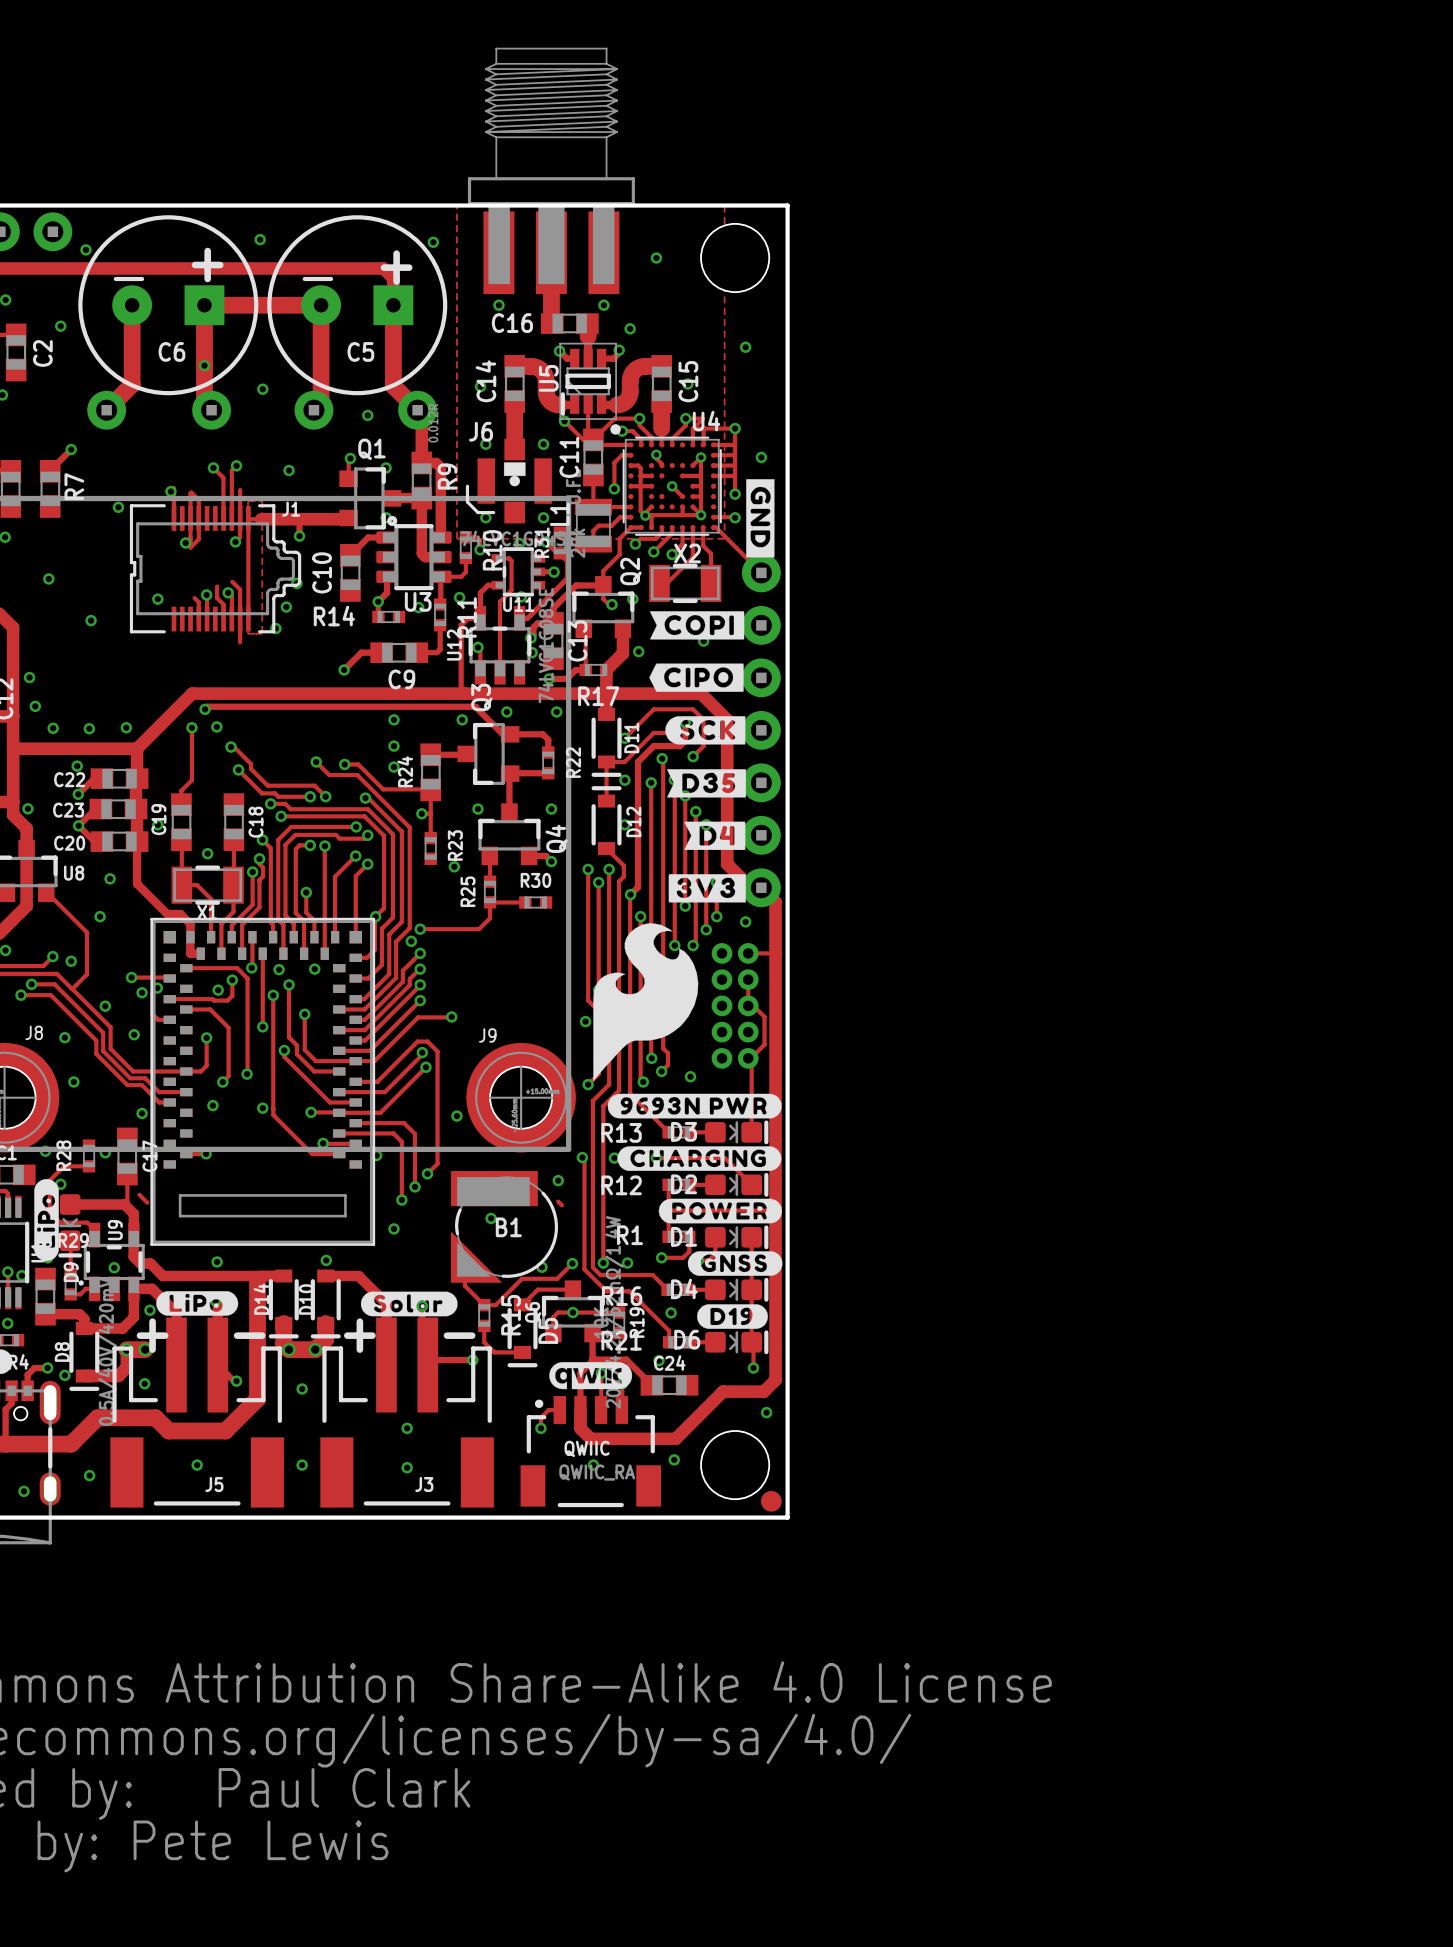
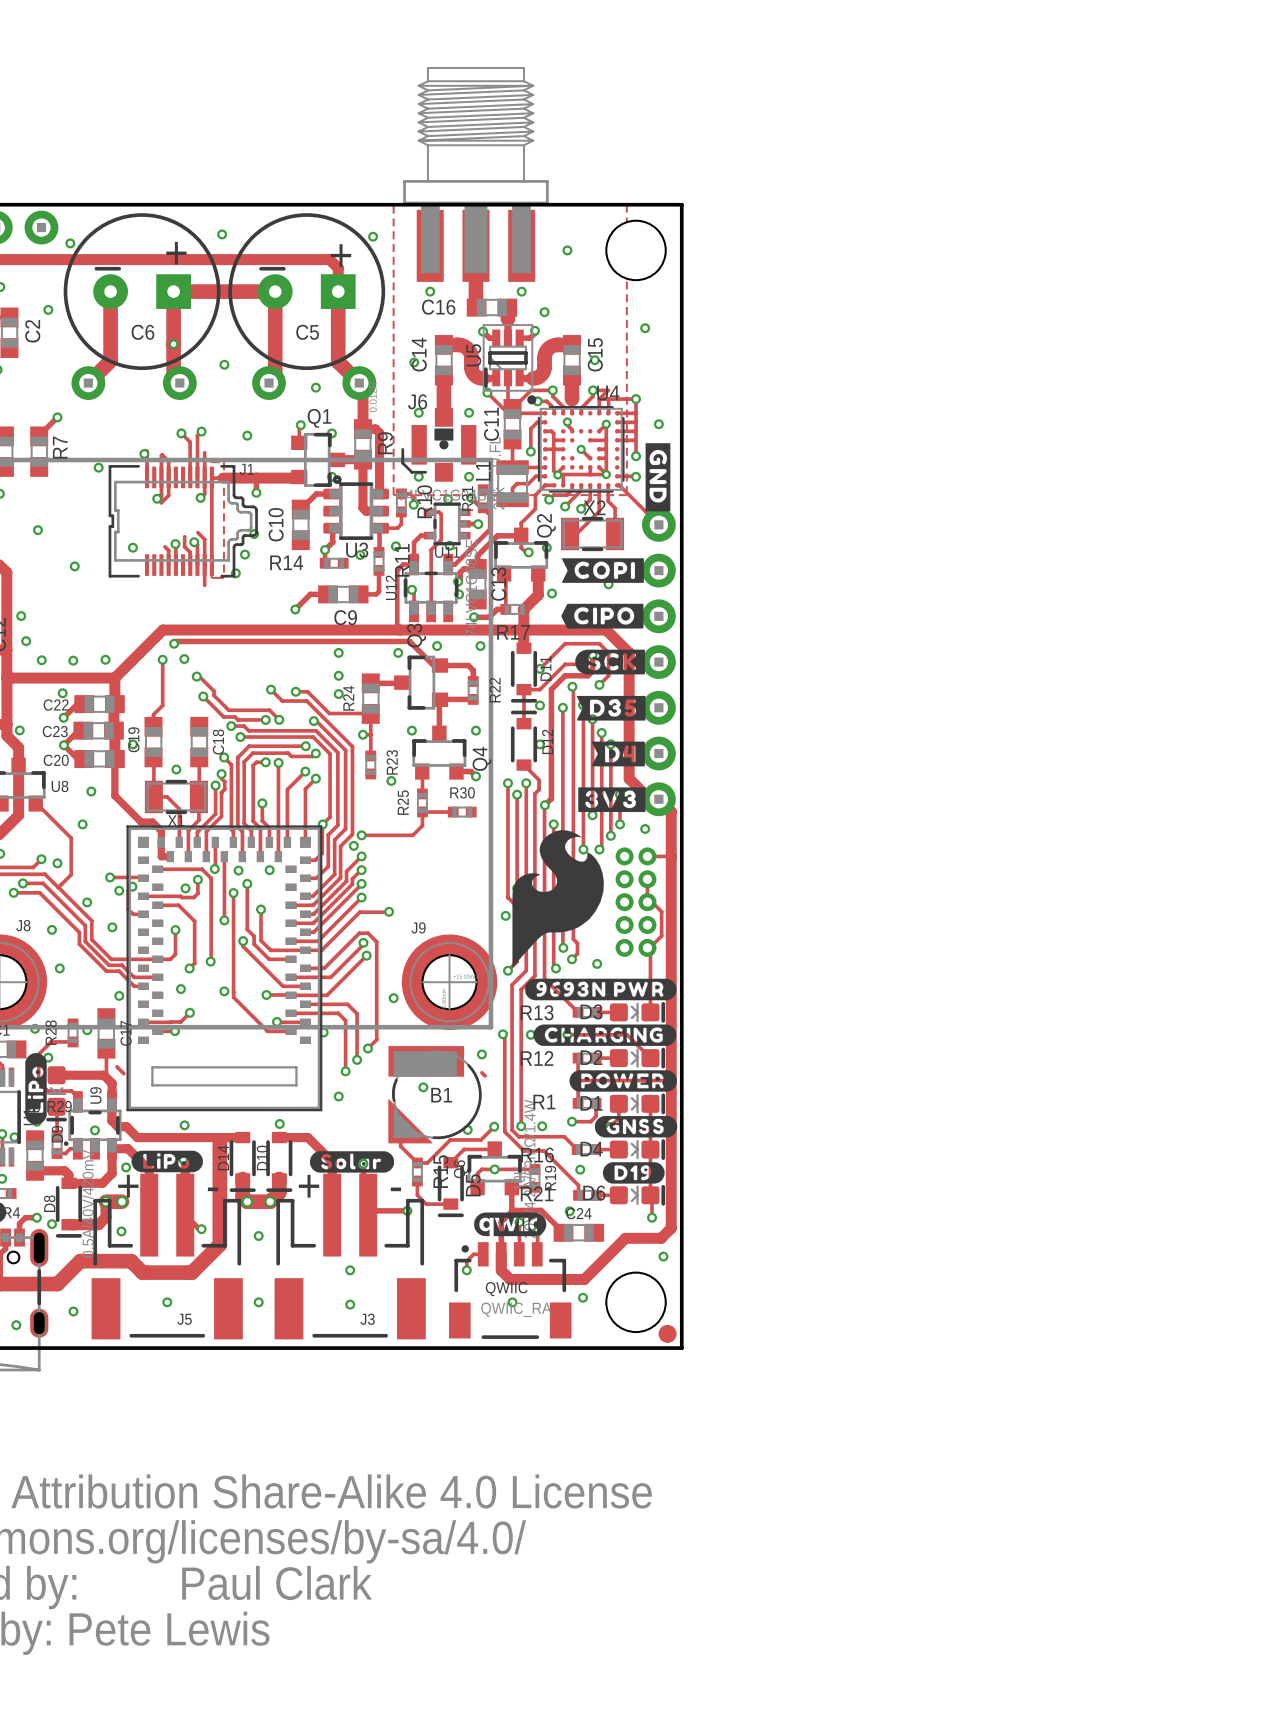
track: none -> (189, 1012) (180, 1022) (143, 1022)
via: none -> (189, 1012)

